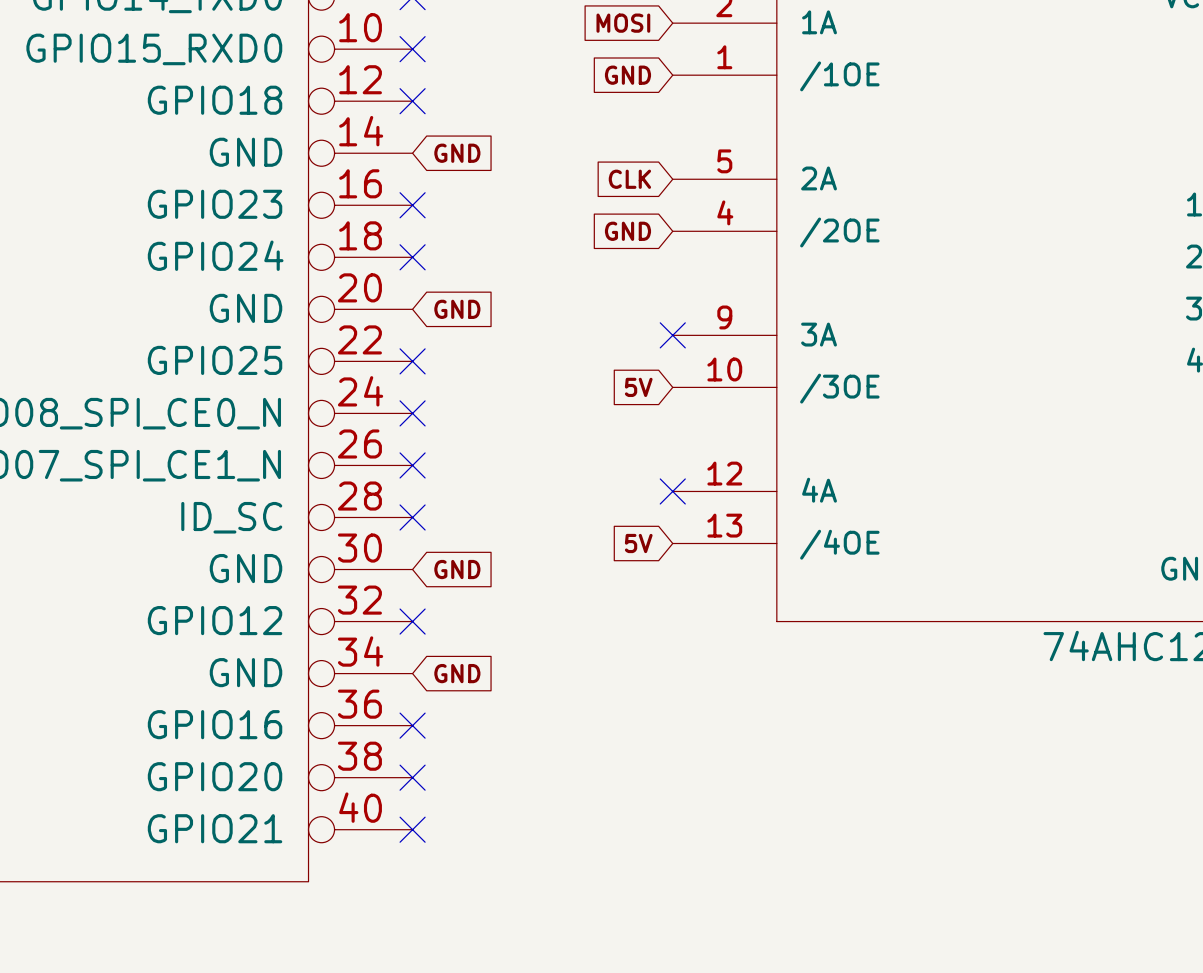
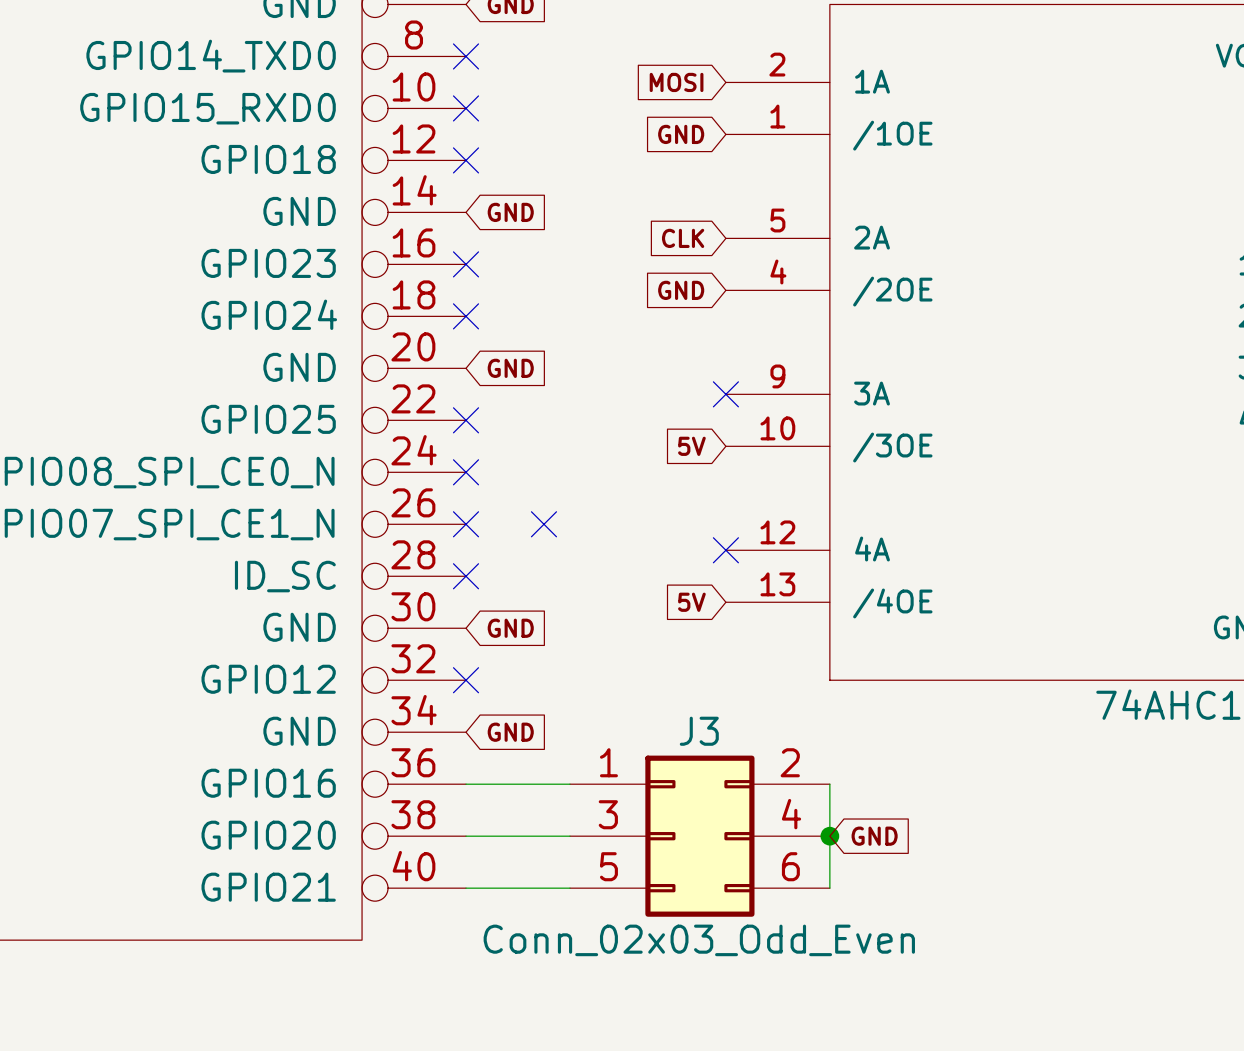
no-connect mark: none -> (543, 524)
wire: none -> (466, 784) (569, 784)
no-connect mark: (412, 725) -> none
wire: none -> (829, 784) (829, 888)
wire: none -> (466, 836) (569, 836)
no-connect mark: (412, 777) -> none
J3: none -> Conn_02x03_Odd_Even (699, 836)
junction: none -> (829, 836)
global label: none -> GND (874, 836)
wire: none -> (466, 888) (569, 888)
no-connect mark: (412, 829) -> none

